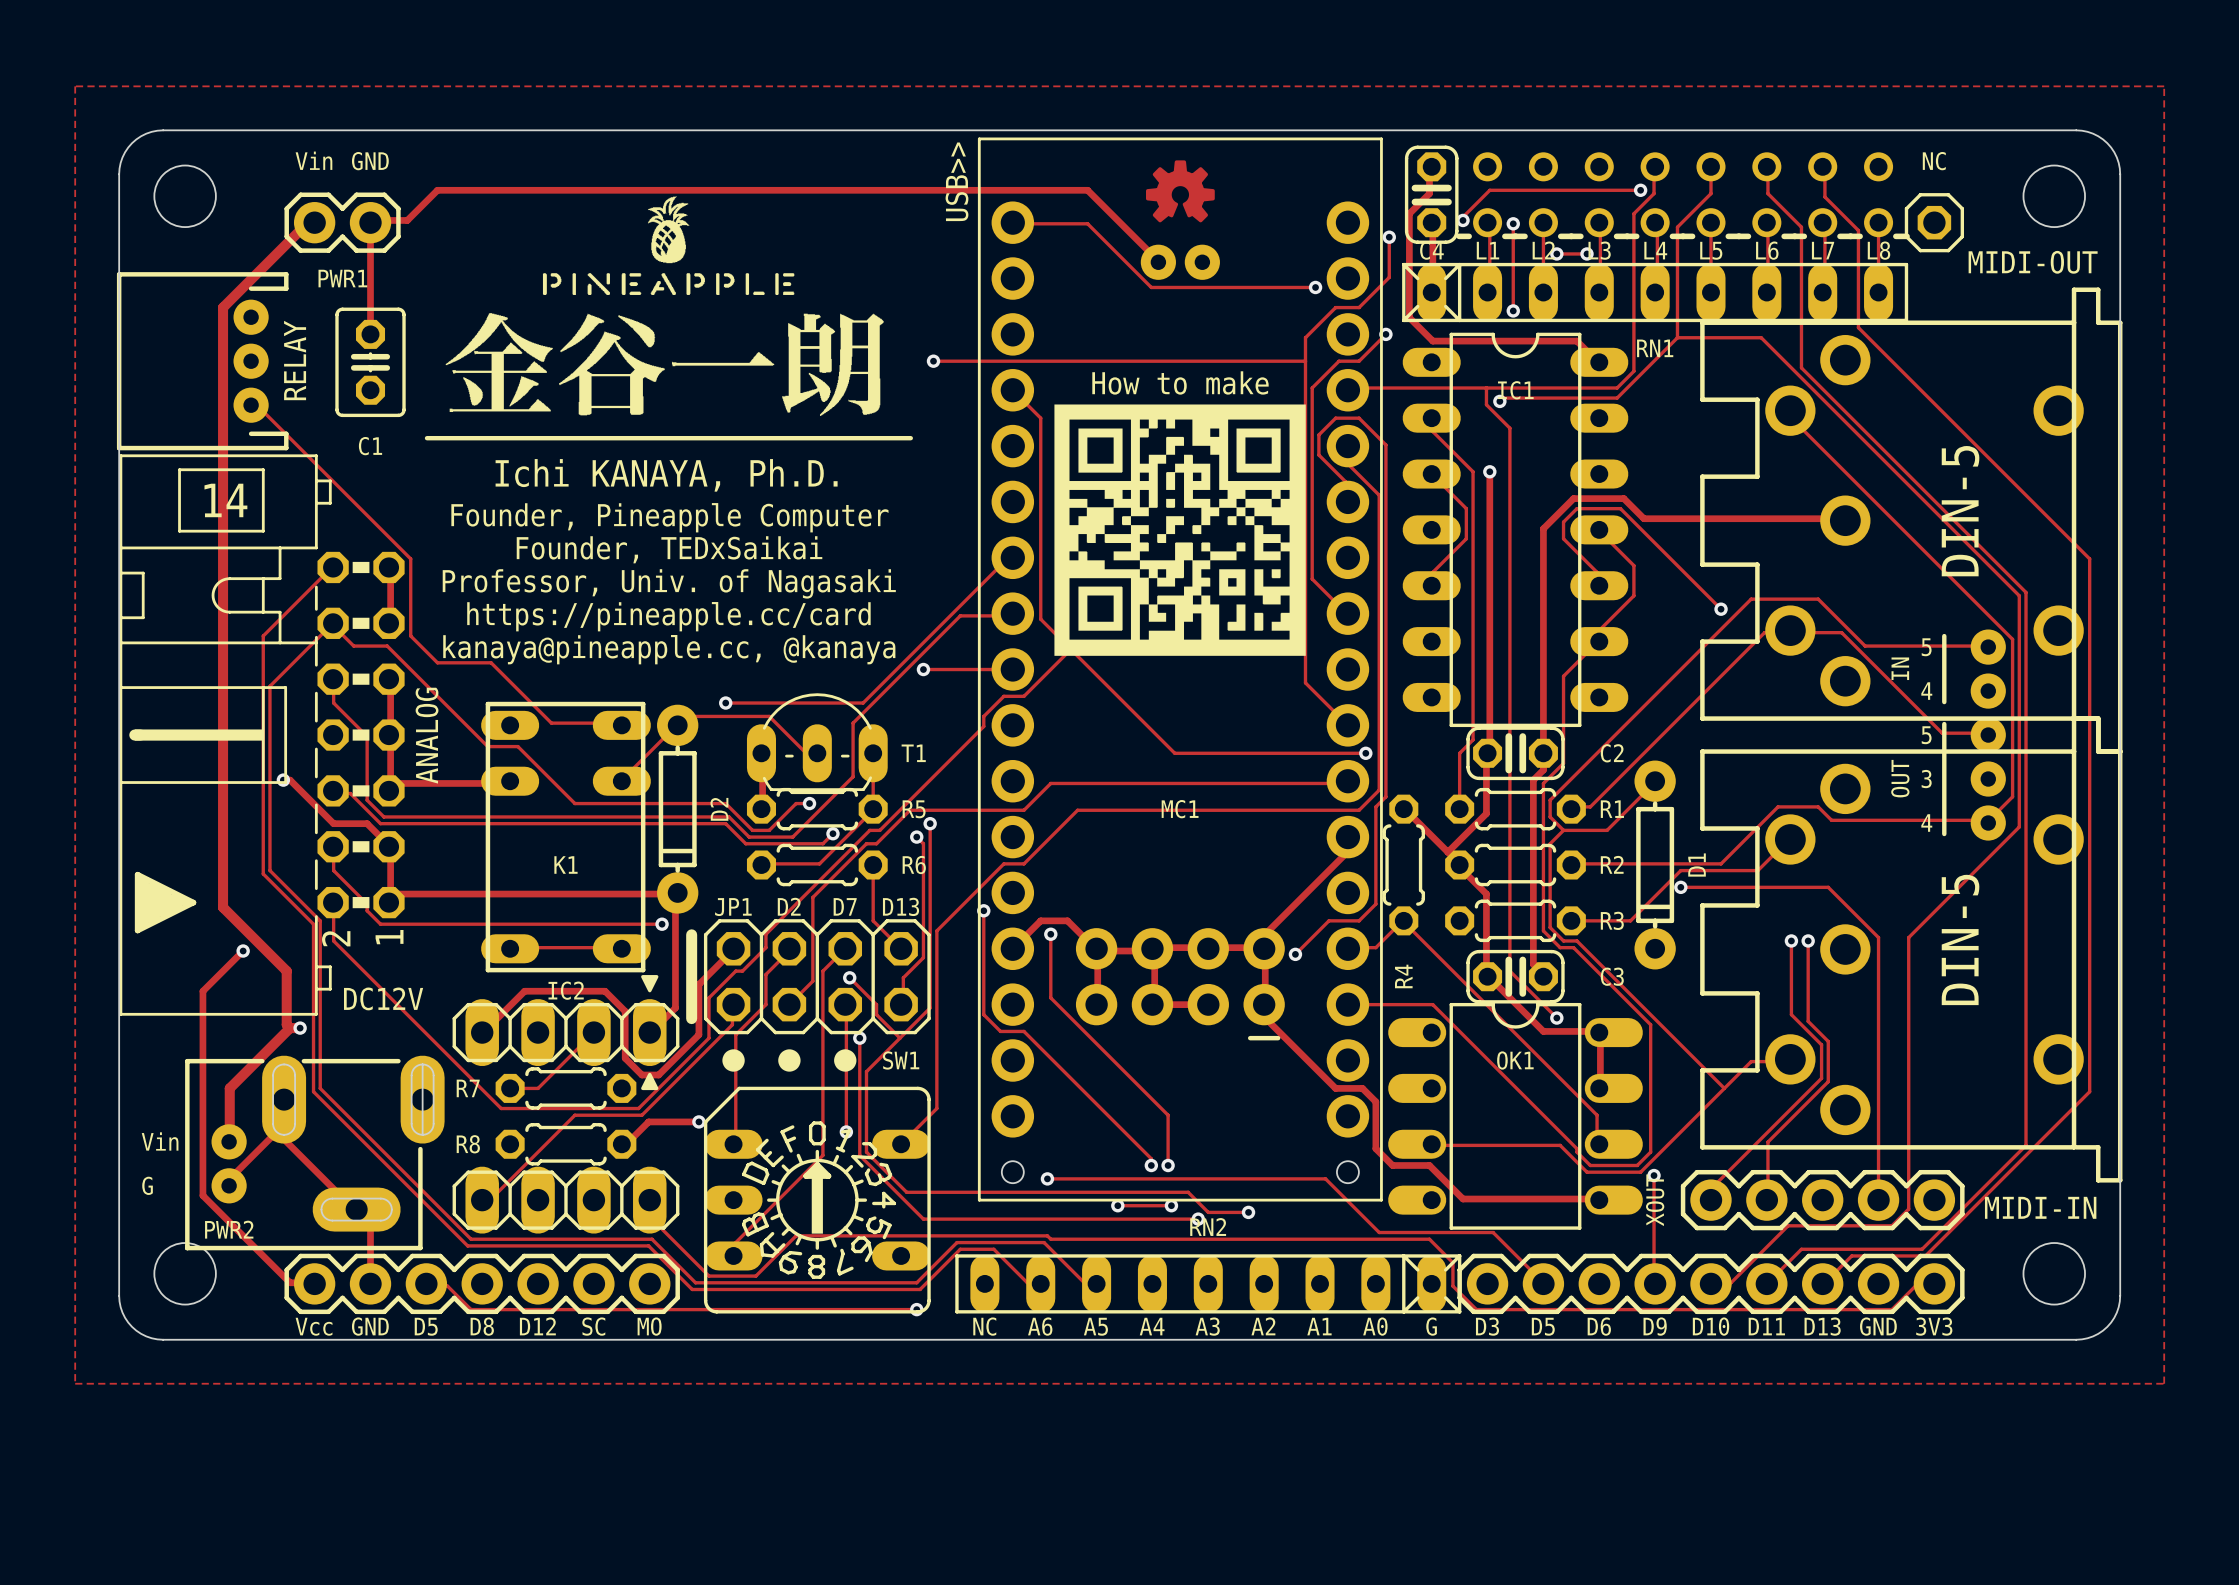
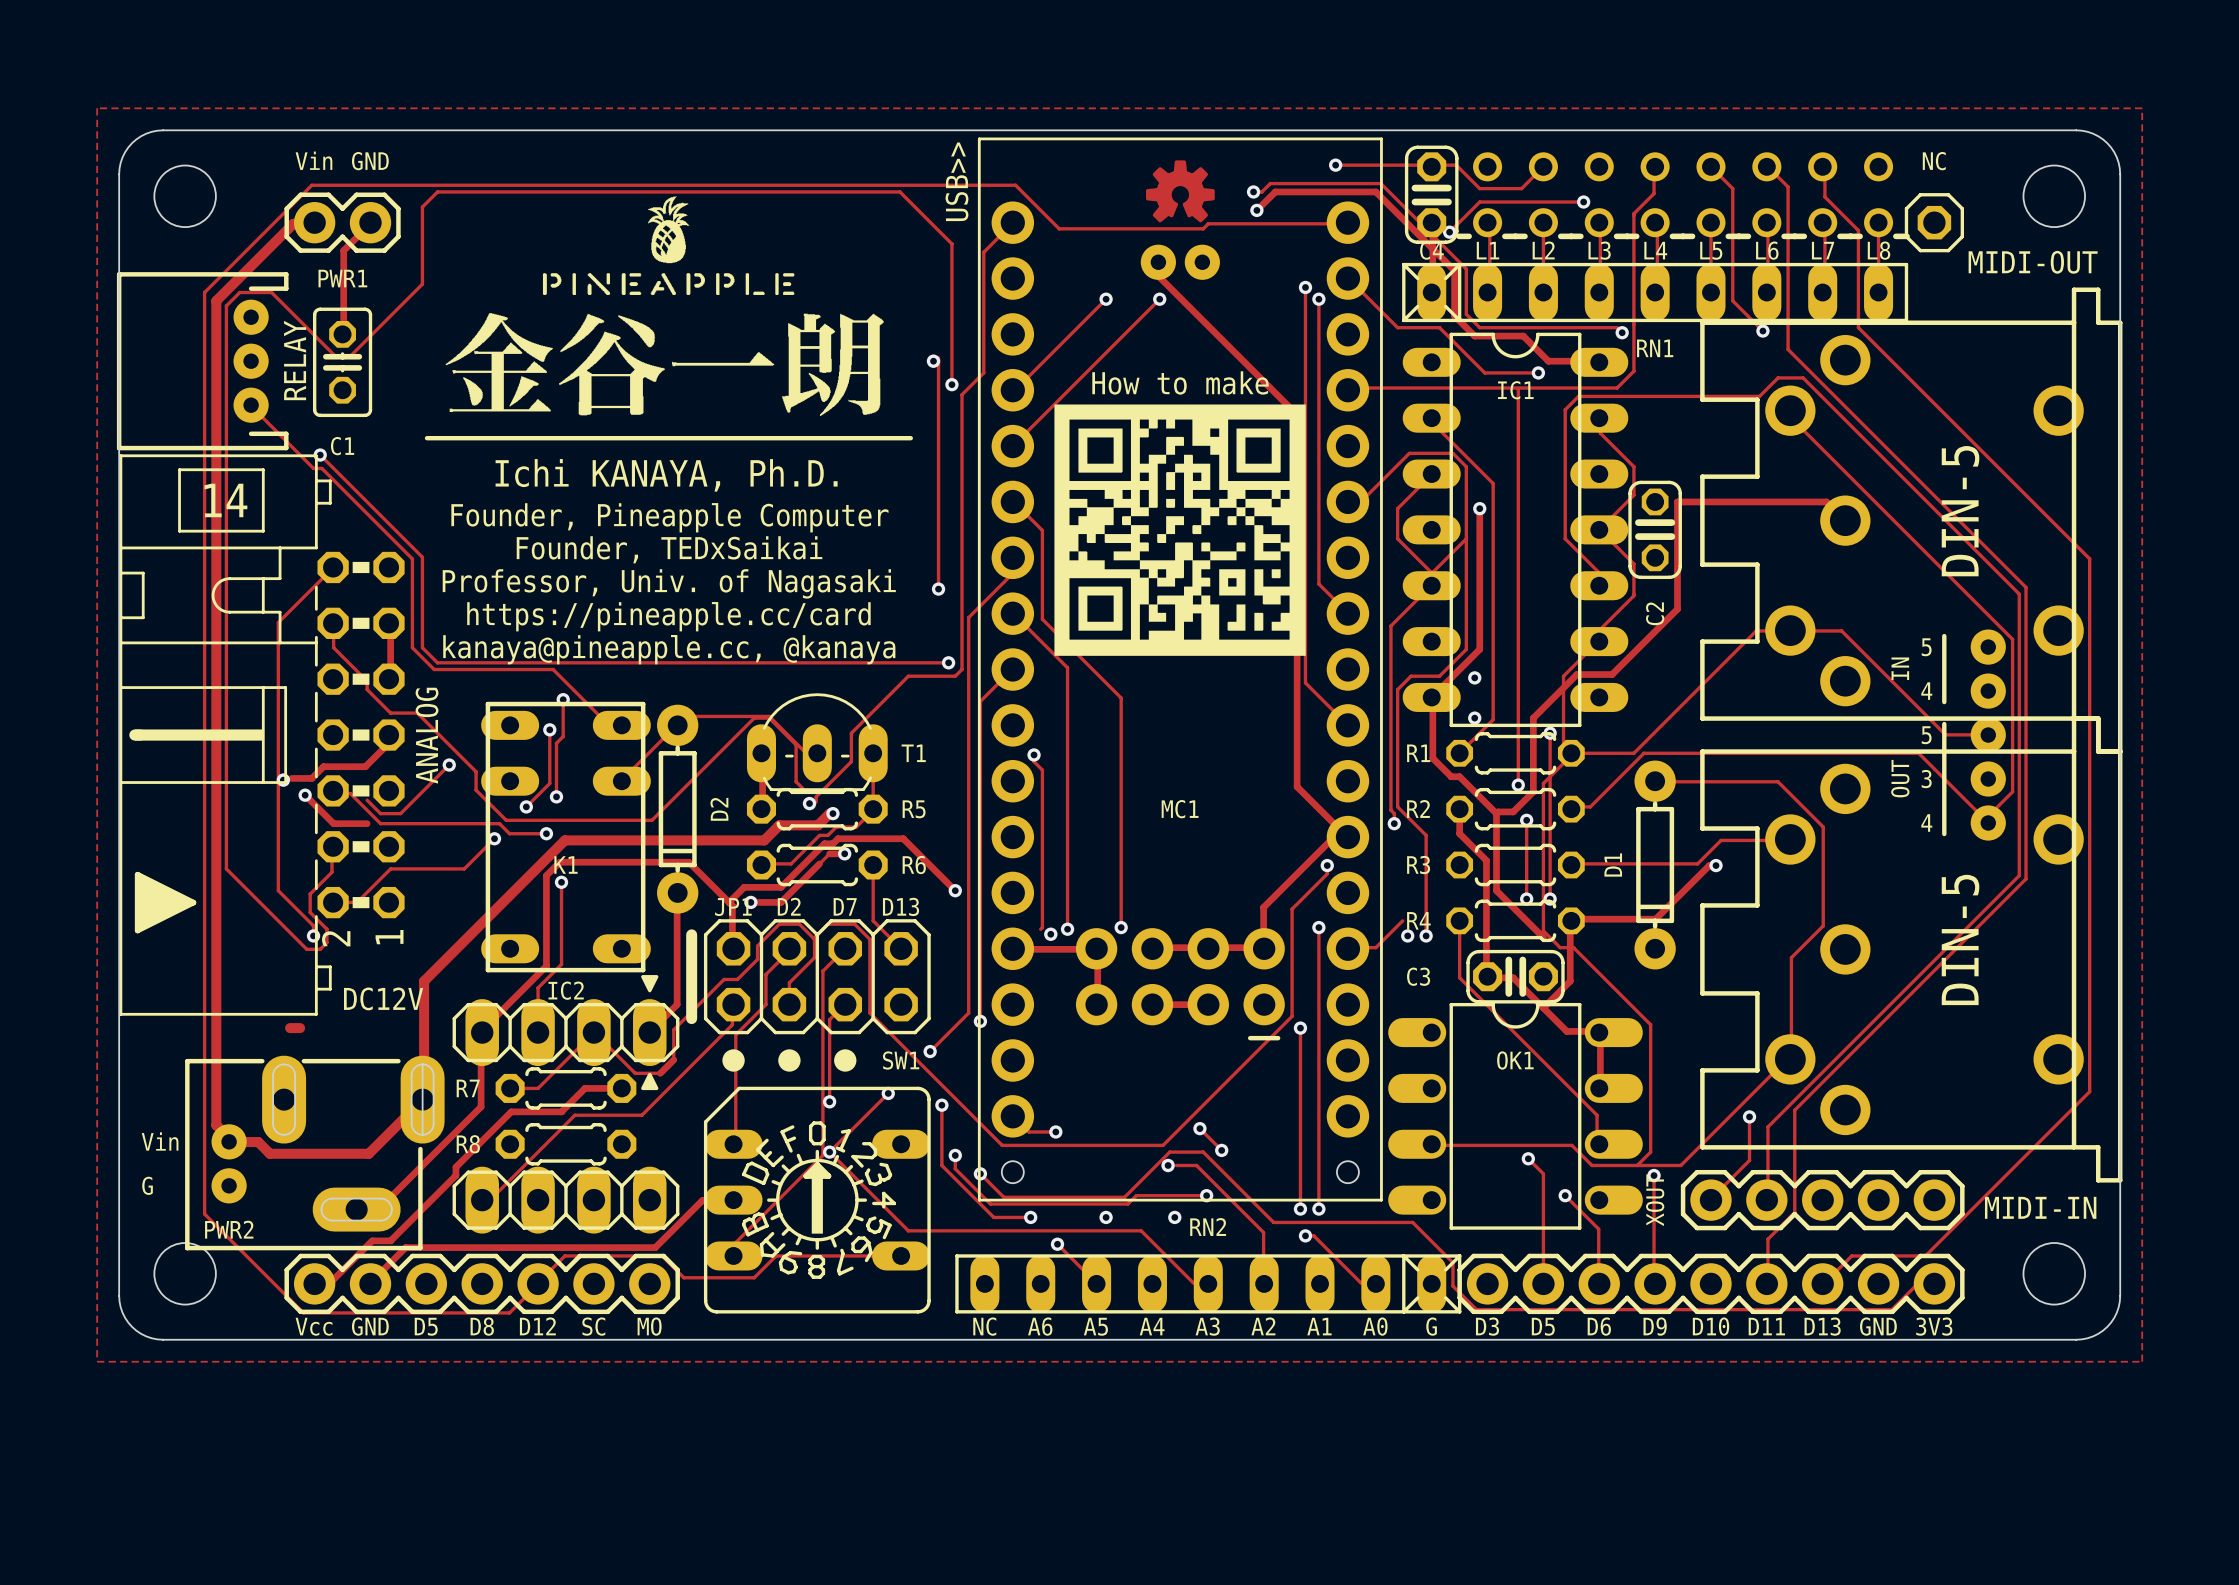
zone outline: (75, 86) (2164, 86) (2164, 1383) (75, 1383) (75, 86) -> (97, 108) (97, 1361) (2142, 1361) (2142, 108) (97, 108)
track: none -> (1335, 165) (1456, 165) (1479, 188) (1521, 188) (1543, 166)
via: none -> (1335, 165)
track: (1431, 166) (1429, 166) (1429, 193) (1409, 213) (1409, 317) (1432, 341) (1576, 341) (1599, 362) -> (1256, 210) (1275, 191) (1375, 191) (1454, 270) (1454, 315) (1474, 336) (1523, 336) (1548, 361) (1599, 362)
track: (1710, 166) (1710, 193) (1677, 227) (1677, 337) -> (1710, 166) (1732, 188) (1732, 300) (1762, 331)
track: (1767, 166) (1767, 193) (1801, 227) (1801, 367) (2026, 592) -> (1767, 166) (1788, 186) (1788, 349) (2026, 587) (2026, 592)
track: (1640, 190) (1489, 190) (1463, 217) (1463, 220) -> none
via: (1640, 190) -> none
track: none -> (1253, 191) (1261, 191) (1270, 183) (1380, 183) (1466, 269) (1466, 314) (1479, 327) (1617, 327) (1622, 332)
via: none -> (1253, 191)
track: none -> (1583, 202) (1479, 202) (1449, 232)
via: none -> (1583, 202)
via: none -> (1256, 210)
via position: (1463, 220) -> (1449, 232)
track: (370, 222) (370, 220) (407, 220) (437, 190) (1087, 190) (1158, 262) -> (1347, 837) (1297, 786) (1297, 414) (1159, 277) (1158, 262)
track: (1012, 222) (1087, 223) (1151, 287) (1315, 287) -> (1012, 222) (983, 252) (983, 372) (961, 394) (961, 669) (955, 676) (908, 676) (851, 733) (851, 761) (816, 796) (816, 801)
track: (306, 223) (223, 307) (223, 907) (286, 971) (286, 1024) (290, 1028) (229, 1088) (229, 1141) -> (306, 223) (293, 223) (216, 300) (216, 1125) (228, 1137) (229, 1141) (258, 1142) (269, 1153) (368, 1153) (422, 1100) (424, 1095) (424, 981) (564, 840) (764, 840) (779, 825) (817, 825) (829, 813) (832, 813)
track: (370, 223) (370, 334) -> (370, 223) (343, 250) (342, 334)
track: (1513, 223) (1513, 310) -> none
via: (1513, 223) -> none
track: (1389, 237) (1389, 277) (1359, 307) (1335, 307) (1305, 337) -> (1305, 287) (1305, 337)
via: (1389, 237) -> none
track: (1556, 253) (1586, 253) -> none
via: (1556, 253) -> none
via: (1586, 253) -> none
track: none -> (1347, 278) (1397, 327) (1439, 327) (1484, 372) (1538, 372)
via: none -> (1305, 287)
via: (1315, 287) -> none
via: none -> (1106, 299)
track: none -> (1159, 299) (1012, 446)
via: none -> (1159, 299)
via: none -> (1318, 299)
C1 footprint: [335, 307, 406, 418] -> [312, 307, 373, 418]
via: (1513, 310) -> none
via: none -> (1762, 331)
via: none -> (1622, 332)
track: (1385, 334) (1359, 361) (1339, 361) (1312, 388) (1312, 579) (1347, 613) -> none
via: (1385, 334) -> none
track: (1677, 337) (1761, 337) (2019, 595) -> (1598, 585) (1598, 572) (1565, 538) (1565, 409) (1578, 396) (1759, 396) (1778, 377) (1803, 377) (2019, 595)
track: (1677, 337) (1617, 398) (1503, 398) (1499, 401) -> none
track: none -> (938, 357) (938, 589)
track: (933, 361) (1305, 361) -> none
via: none -> (1538, 372)
via: none -> (951, 384)
track: (1486, 388) (1486, 404) (1509, 428) (1509, 971) (1556, 1018) -> none
track: none -> (1518, 389) (1518, 785)
track: (1013, 391) (1040, 418) (1040, 619) (1174, 753) (1365, 753) -> (1013, 391) (1106, 299)
via: (1499, 401) -> none
track: (251, 405) (253, 408) (259, 408) (410, 558) (410, 636) (422, 647) -> (320, 455) (422, 557) (422, 647)
track: none -> (251, 405) (313, 468) (321, 468) (412, 558) (412, 647) (434, 669) (553, 669) (608, 724) (621, 724)
track: (1432, 423) (1432, 431) (1473, 471) (1473, 739) -> (1432, 423) (1493, 483) (1493, 719) (1473, 739)
track: (1318, 434) (1335, 418) (1359, 418) (1385, 444) (1385, 796) (1375, 806) (1375, 904) (1359, 920) (1328, 920) (1295, 954) -> (1318, 434) (1318, 299)
track: (1347, 446) (1349, 465) (1379, 495) (1379, 790) (1359, 810) (1077, 810) (1023, 863) (1003, 863) (936, 930) (936, 1108) (901, 1144) -> none
via: none -> (320, 455)
track: (1318, 455) (1345, 481) (1345, 501) (1347, 501) -> (1318, 455) (1318, 584) (1347, 613)
track: (1489, 471) (1489, 753) (1486, 753) (1486, 813) (1447, 852) -> none
via position: (1489, 471) -> (1479, 508)
track: (1431, 474) (1466, 508) -> (1347, 501) (1360, 501) (1409, 453) (1452, 453) (1466, 466) (1466, 508)
track: none -> (1431, 474) (1397, 508) (1397, 538) (1431, 572) (1431, 585) (1390, 625) (1390, 810) (1394, 813) (1394, 823)
track: none -> (1012, 501) (1042, 530) (1042, 619) (1121, 698) (1121, 927)
track: none -> (1479, 508) (1479, 649) (1431, 697) (1432, 758) (1451, 776) (1459, 776) (1496, 813)
track: (1845, 520) (1845, 518) (1643, 518) (1623, 498) (1573, 498) (1543, 528) (1543, 770) (1533, 780) -> (1845, 520) (1826, 501) (1677, 501) (1677, 609) (1612, 674) (1576, 674) (1533, 718) (1533, 780)
track: (1599, 529) (1633, 565) -> (1599, 418) (1600, 433) (1633, 466) (1633, 495) (1599, 529) (1633, 565)
track: none -> (1466, 538) (1466, 649) (1439, 676) (1411, 676) (1397, 689) (1397, 806) (1426, 835) (1426, 935)
track: (1012, 557) (1010, 555) (863, 703) (725, 703) -> (1012, 557) (1012, 574) (968, 617) (968, 1013) (930, 1051)
track: (333, 567) (263, 636) (263, 873) (313, 925) -> (333, 567) (278, 622) (278, 890) (313, 925)
track: (388, 567) (390, 568) (390, 622) (388, 623) -> (388, 679) (390, 677) (390, 624) (388, 623)
track: (1598, 585) (1597, 585) (1597, 572) (1563, 538) (1563, 522) (1576, 508) (1620, 508) (1721, 609) -> none
via: none -> (938, 589)
via: (1721, 609) -> none
track: (1012, 613) (1010, 615) (960, 615) (853, 723) (853, 776) (792, 837) (749, 837) (729, 816) (383, 816) (380, 813) -> (449, 765) (400, 813) (380, 813)
track: none -> (1012, 613) (1067, 667) (1067, 929)
track: none -> (333, 623) (333, 647) (367, 681) (367, 689) (390, 713) (417, 713) (476, 771) (476, 790) (506, 820) (652, 820) (754, 718) (769, 718) (796, 744) (796, 781) (802, 788)
track: (1988, 647) (1865, 646) (1818, 599) (1751, 599) (1550, 800) -> (1550, 733) (1550, 800)
track: (1070, 649) (1023, 696) (1003, 696) (983, 716) (983, 726) (879, 830) (869, 830) (765, 934) (765, 947) (742, 971) (735, 971) (708, 997) (708, 1038) (638, 1108) (501, 1108) (333, 940) (333, 902) -> (494, 838) (464, 868) (390, 868) (357, 902) (333, 902)
track: (491, 662) (551, 723) (621, 723) (621, 724) -> (491, 662) (948, 662)
track: (923, 669) (1012, 669) -> (980, 1021) (980, 701) (1012, 669)
via position: (923, 669) -> (948, 662)
via: none -> (1474, 677)
track: (333, 679) (333, 703) (367, 736) (367, 800) -> none
track: (388, 679) (390, 679) (390, 733) (388, 735) (390, 736) (390, 786) (388, 790) (397, 783) (507, 783) (510, 781) -> none
track: none -> (563, 699) (563, 736) (556, 743) (556, 796)
via: none -> (563, 699)
via: (725, 703) -> none
via: none -> (1474, 718)
C2 footprint: [1466, 726, 1565, 781] -> [1628, 480, 1682, 580]
track: none -> (549, 729) (549, 783) (526, 806)
via: none -> (549, 729)
via: none -> (1550, 733)
track: none -> (388, 735) (388, 743) (365, 766) (323, 766) (311, 778) (291, 778)
track: (1988, 735) (1985, 733) (1942, 733) (1841, 632) (1791, 632) (1790, 630) (1788, 632) (1764, 632) (1643, 753) -> (2012, 791) (1985, 818) (1988, 823) (1918, 753) (1643, 753)
track: none -> (1988, 735) (1945, 734) (1841, 630) (1756, 630) (1633, 753) (1571, 753)
via: (1365, 753) -> none
track: (1459, 753) (1459, 809) -> none
C2 name position: C2 (1612, 753) -> C2 (1655, 613)
track: none -> (1034, 754) (1034, 761) (1042, 770) (1042, 927) (1040, 929)
via: none -> (1034, 754)
via: none -> (449, 765)
track: (283, 780) (290, 780) (305, 795) -> none
track: (1347, 781) (1345, 783) (1050, 783) (1023, 810) (910, 810) (876, 843) (866, 843) (812, 897) (812, 981) (789, 1004) -> none
track: (1655, 781) (1607, 830) (1563, 830) -> none
via: none -> (1518, 785)
R1 footprint: [1445, 787, 1586, 831] -> [1446, 732, 1585, 775]
track: (1533, 791) (1533, 964) (1543, 976) -> (1533, 791) (1513, 811) (1498, 811) (1496, 813)
track: (2012, 791) (2012, 796) (1988, 823) (1985, 820) (1831, 820) (1818, 806) (1778, 806) (1721, 863) (1697, 863) -> none
R4 footprint: [1382, 794, 1426, 936] -> [1446, 899, 1585, 943]
via: none -> (305, 795)
via: none -> (556, 796)
track: (809, 803) (796, 803) (769, 830) (752, 830) (725, 803) (574, 803) (517, 746) (487, 746) (387, 646) (353, 646) (333, 623) (269, 686) (269, 870) (320, 920) (320, 1088) (471, 1239) (652, 1239) (695, 1282) (916, 1282) (956, 1242) (1044, 1242) (1084, 1282) (1096, 1283) -> (1057, 1244) (1096, 1283)
via: none -> (526, 806)
track: (1403, 809) (1459, 863) (1459, 867) (1486, 894) -> (1459, 809) (1459, 833) (1486, 860) (1486, 894)
R1 name position: R1 (1612, 809) -> R1 (1418, 753)
via: none -> (832, 813)
track: none -> (1496, 813) (1496, 890) (1543, 937)
track: (1550, 816) (1563, 830) -> (1550, 816) (1550, 843)
track: none -> (1526, 820) (1526, 899)
via: none -> (1526, 820)
track: (367, 823) (390, 847) (390, 900) (388, 902) (390, 894) (672, 894) (677, 892) (675, 894) (675, 1007) (649, 1032) -> (677, 892) (677, 1004) (649, 1032)
track: (499, 823) (725, 823) (745, 843) (822, 843) (832, 833) -> (499, 823) (509, 833) (546, 833)
track: (930, 823) (930, 1007) (866, 1071) (866, 1152) (906, 1192) (1188, 1192) (1208, 1212) (1248, 1212) -> none
via: (930, 823) -> none
via: none -> (1394, 823)
track: (856, 827) (829, 853) -> (844, 853) (829, 853)
track: (2019, 827) (1908, 937) (1908, 1209) (1891, 1225) (1788, 1225) (1731, 1282) (1710, 1283) -> (2019, 827) (2019, 875) (1767, 1126) (1767, 1142)
track: (1563, 830) (1550, 843) -> none
via: none -> (546, 833)
via: (832, 833) -> none
track: (916, 837) (923, 843) (923, 957) (903, 977) (903, 1004) (901, 1004) -> none
via: (916, 837) -> none
track: (1347, 837) (1345, 837) (1345, 853) (1265, 934) (1265, 1018) (1335, 1088) (1362, 1088) (1375, 1101) (1375, 1148) (1392, 1165) (1429, 1165) (1463, 1199) (1599, 1200) -> (1347, 837) (1339, 832) (1263, 907) (1264, 948) (1261, 947)
via: none -> (494, 838)
track: (1790, 839) (1757, 870) (1680, 870) (1630, 920) (1571, 920) -> (1790, 839) (1721, 840) (1697, 863)
R2 footprint: [1445, 843, 1586, 887] -> [1446, 787, 1585, 831]
track: (333, 846) (333, 870) (367, 904) (367, 910) (380, 924) (662, 924) -> (333, 846) (331, 872) (310, 894) (310, 912) (326, 929) (326, 942) (320, 949) (306, 949) (226, 868) (226, 305) (239, 292) (271, 292) (335, 356) (350, 356) (422, 284) (422, 207) (437, 191) (899, 191) (951, 243) (951, 384)
via: none -> (844, 853)
track: (791, 863) (819, 863) -> (791, 863) (819, 835) (827, 835) (836, 827) (856, 827)
track: none -> (819, 863) (781, 902) (750, 902)
R2 name position: R2 (1612, 864) -> R2 (1418, 808)
track: none -> (1327, 865) (1327, 873) (1292, 909) (1292, 1016) (1163, 1145) (1002, 1145) (869, 1013) (869, 939) (854, 924) (827, 924) (813, 938)
via: none -> (1327, 865)
D1 name position: D1 (1697, 865) -> D1 (1613, 865)
track: none -> (1716, 865) (1709, 865) (1655, 919) (1573, 919) (1570, 920) (1570, 981) (1543, 1007)
track: (2026, 878) (2026, 1145) (1922, 1249) (1801, 1249) (1767, 1282) -> (2026, 878) (1794, 1110) (1794, 1212) (1767, 1239) (1767, 1282)
track: none -> (561, 882) (561, 964) (538, 987) (538, 1032)
via: none -> (561, 882)
track: (1680, 887) (1828, 887) (1878, 937) (1878, 1200) -> none
via position: (1680, 887) -> (1716, 865)
track: none -> (955, 890) (903, 838) (838, 838) (832, 843) (824, 843) (781, 887) (744, 887) (729, 902)
via: none -> (955, 890)
R3 footprint: [1445, 899, 1586, 943] -> [1446, 843, 1585, 887]
via: none -> (1526, 899)
track: (1550, 899) (1550, 927) (1563, 940) (1576, 940) (1724, 1088) -> none
via: none -> (1550, 899)
via: none -> (750, 902)
track: (983, 910) (983, 1014) (1000, 1031) (1023, 1031) (1151, 1158) (1151, 1165) -> none
via: (983, 910) -> none
track: (1403, 920) (1459, 977) -> (1459, 920) (1459, 977)
R3 name position: R3 (1612, 920) -> R3 (1418, 865)
via: (662, 924) -> none
via: none -> (1121, 927)
track: none -> (1318, 927) (1318, 1209)
via: none -> (1067, 929)
track: (1050, 934) (1050, 997) (1168, 1115) (1168, 1165) -> none
track: (313, 935) (313, 1091) (467, 1245) (648, 1245) (692, 1289) (920, 1289) (960, 1249) (993, 1249) (1027, 1282) (1040, 1283) -> none
via: none -> (313, 935)
via: none -> (1407, 935)
via: none -> (1426, 935)
track: (1791, 940) (1791, 957) -> (1655, 781) (1778, 781) (1823, 827) (1823, 925) (1791, 957)
via: (1791, 940) -> none
track: (1808, 940) (1808, 1021) (1828, 1041) (1828, 1081) (1767, 1142) -> none
via: (1808, 940) -> none
track: (510, 948) (621, 948) -> none
track: (733, 948) (698, 984) (698, 1034) (673, 1059) -> (789, 1004) (789, 982) (814, 957) (814, 939) (799, 924) (779, 924) (757, 945) (757, 959) (737, 979) (724, 979) (673, 1029) (673, 1059)
track: none -> (733, 948) (732, 905) (688, 862) (559, 862) (546, 875) (546, 966) (481, 1033) (481, 1106) (378, 1209) (356, 1209)
track: (1012, 948) (1040, 920) (1067, 920) (1094, 947) (1101, 951) (1151, 951) (1152, 948) (1154, 951) (1154, 1004) -> (1012, 948) (1096, 948)
track: (243, 951) (202, 991) (202, 1195) (290, 1282) (314, 1283) -> (621, 1088) (584, 1088) (561, 1111) (511, 1111) (455, 1167) (455, 1175) (390, 1240) (372, 1240) (330, 1282) (314, 1283)
via: (243, 951) -> none
via position: (1295, 954) -> (1318, 927)
track: (1486, 974) (1543, 1031) (1566, 1031) -> (1488, 977) (1513, 977) (1566, 1031)
R4 name position: R4 (1403, 976) -> R4 (1418, 920)
C3 name position: C3 (1612, 976) -> C3 (1418, 976)
track: (849, 977) (876, 1004) (876, 1014) (899, 1038) -> none
via: (849, 977) -> none
track: (845, 1004) (846, 1131) -> (845, 1004) (829, 1019) (829, 1101)
track: (1347, 1004) (1432, 1004) (1592, 1165) -> none
track: (1791, 1014) (1821, 1044) (1821, 1078) (1710, 1188) (1710, 1199) -> (1791, 1014) (1790, 1059) (1786, 1059) (1680, 1165) (1637, 1165)
via: (1556, 1018) -> none
via: none -> (980, 1021)
via: (300, 1028) -> none
track: none -> (1300, 1028) (1300, 1209)
via: none -> (1300, 1028)
track: (482, 1032) (524, 991) (605, 991) (625, 1011) (625, 1058) (641, 1075) (658, 1075) (660, 1073) -> (593, 1032) (635, 1073) (660, 1073)
track: (859, 1038) (859, 1155) (923, 1219) (1198, 1219) -> none
via: (859, 1038) -> none
via: none -> (930, 1051)
track: (1790, 1059) (1788, 1061) (1751, 1061) (1640, 1172) (1586, 1172) (1560, 1145) -> (1592, 1165) (1571, 1145) (1560, 1145)
track: none -> (888, 1093) (829, 1152) (908, 1230) (1141, 1230) (1193, 1282) (1208, 1283)
via: none -> (888, 1093)
via: none -> (829, 1101)
track: none -> (941, 1105) (941, 1165) (993, 1217) (1030, 1217)
via: none -> (941, 1105)
track: none -> (1012, 1116) (1029, 1131) (1055, 1131)
track: none -> (1749, 1116) (1749, 1160) (1710, 1199)
via: none -> (1749, 1116)
track: (698, 1121) (648, 1121) (628, 1142) (621, 1142) (621, 1144) -> none
via: (698, 1121) -> none
track: none -> (1199, 1128) (1221, 1150)
via: none -> (1199, 1128)
via: (846, 1131) -> none
via: none -> (1055, 1131)
via: none -> (1221, 1150)
via: none -> (829, 1152)
track: none -> (955, 1155) (955, 1168) (990, 1204) (1127, 1204) (1136, 1195) (1206, 1195)
via: none -> (955, 1155)
via: none -> (1528, 1158)
via: (1151, 1165) -> none
track: none -> (1176, 1165) (1196, 1165) (1263, 1232) (1264, 1283)
via: none -> (980, 1173)
track: (1047, 1178) (1325, 1178) (1379, 1232) (1493, 1232) (1543, 1282) -> (1528, 1158) (1543, 1173) (1543, 1282)
via: (1047, 1178) -> none
track: (229, 1185) (229, 1178) (283, 1125) (284, 1099) (276, 1131) (353, 1209) (356, 1209) (370, 1225) (370, 1282) -> (733, 1200) (702, 1200) (655, 1247) (405, 1247) (370, 1282)
via: none -> (1206, 1195)
track: none -> (1565, 1195) (1598, 1229) (1599, 1283)
via: none -> (1565, 1195)
track: (649, 1200) (652, 1202) (652, 1219) (708, 1276) (755, 1276) -> (1347, 222) (1208, 223) (1203, 228) (1059, 228) (1015, 185) (311, 185) (204, 292) (204, 1214) (303, 1312) (509, 1312) (564, 1255) (662, 1255) (683, 1277) (754, 1277) (755, 1276)
track: (1117, 1205) (1171, 1205) -> none
via position: (1117, 1205) -> (1106, 1217)
via position: (1171, 1205) -> (1174, 1217)
via: none -> (1300, 1209)
via: none -> (1318, 1209)
via: (1248, 1212) -> none
via: none -> (1030, 1217)
via: (1198, 1219) -> none
track: none -> (1305, 1235) (1313, 1235) (1360, 1282) (1375, 1283)
via: none -> (1305, 1235)
track: (1429, 1239) (1050, 1239) (1047, 1235) (796, 1235) (776, 1255) -> (1429, 1239) (1412, 1222) (1273, 1222) (1203, 1152) (1169, 1152) (1124, 1197) (1003, 1197) (980, 1173)
via: none -> (1057, 1244)
track: none -> (776, 1255) (901, 1255)
track: (426, 1283) (427, 1286) (447, 1286) (471, 1309) (916, 1309) -> none
via: (916, 1309) -> none

